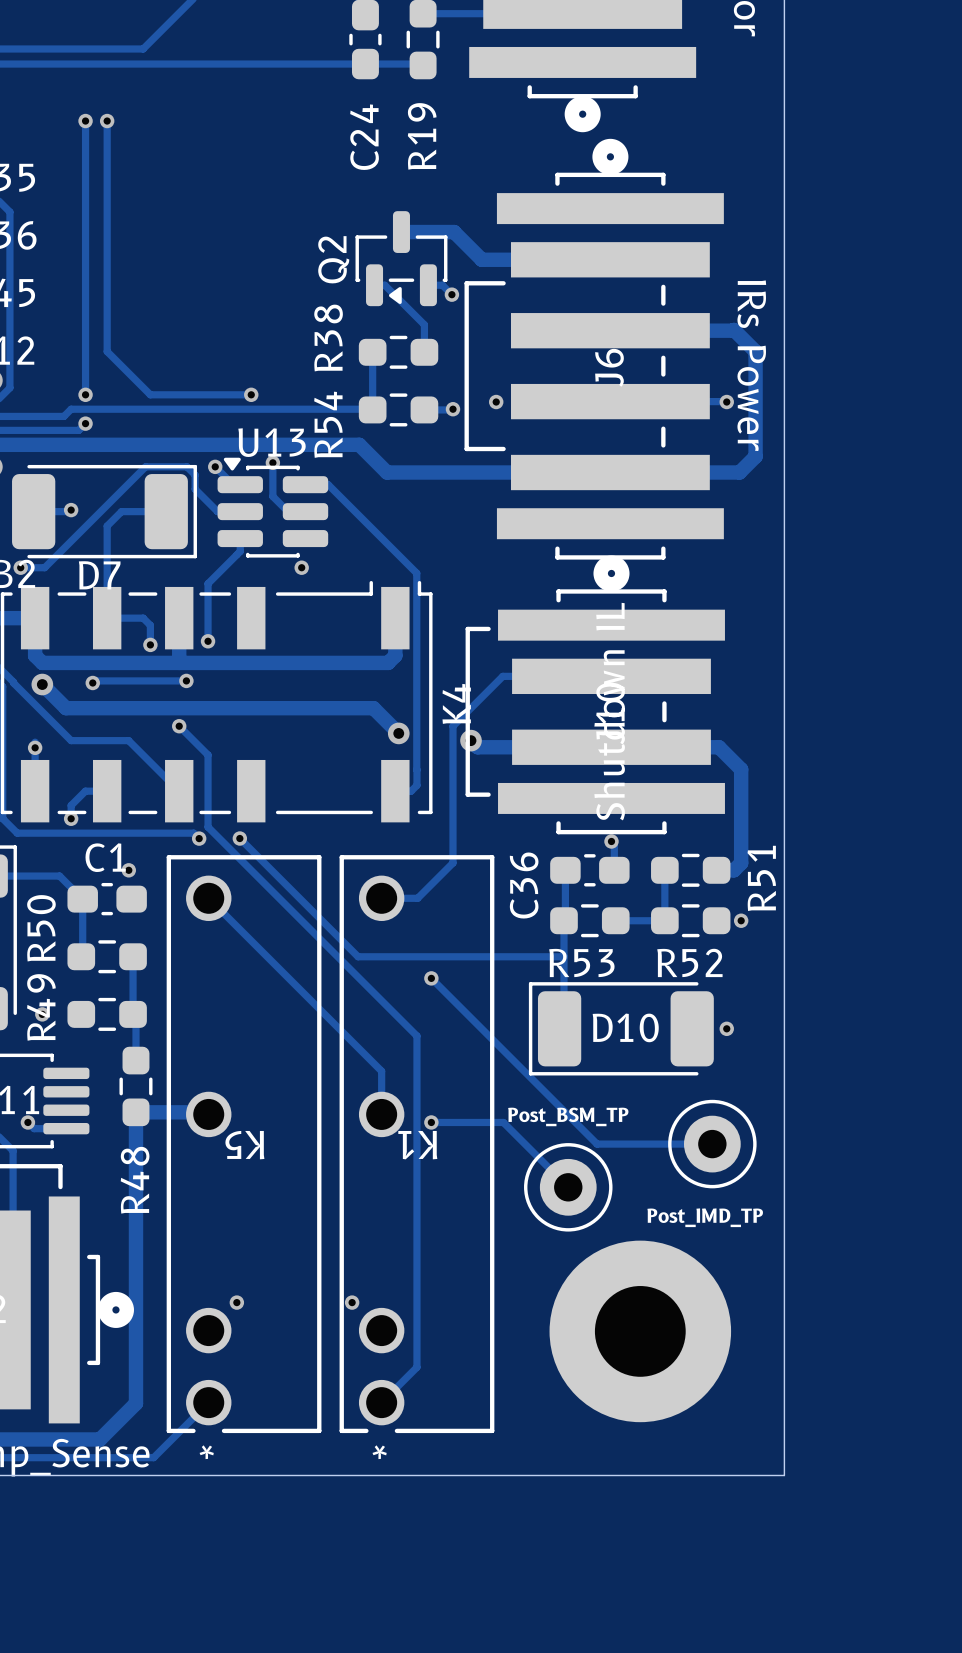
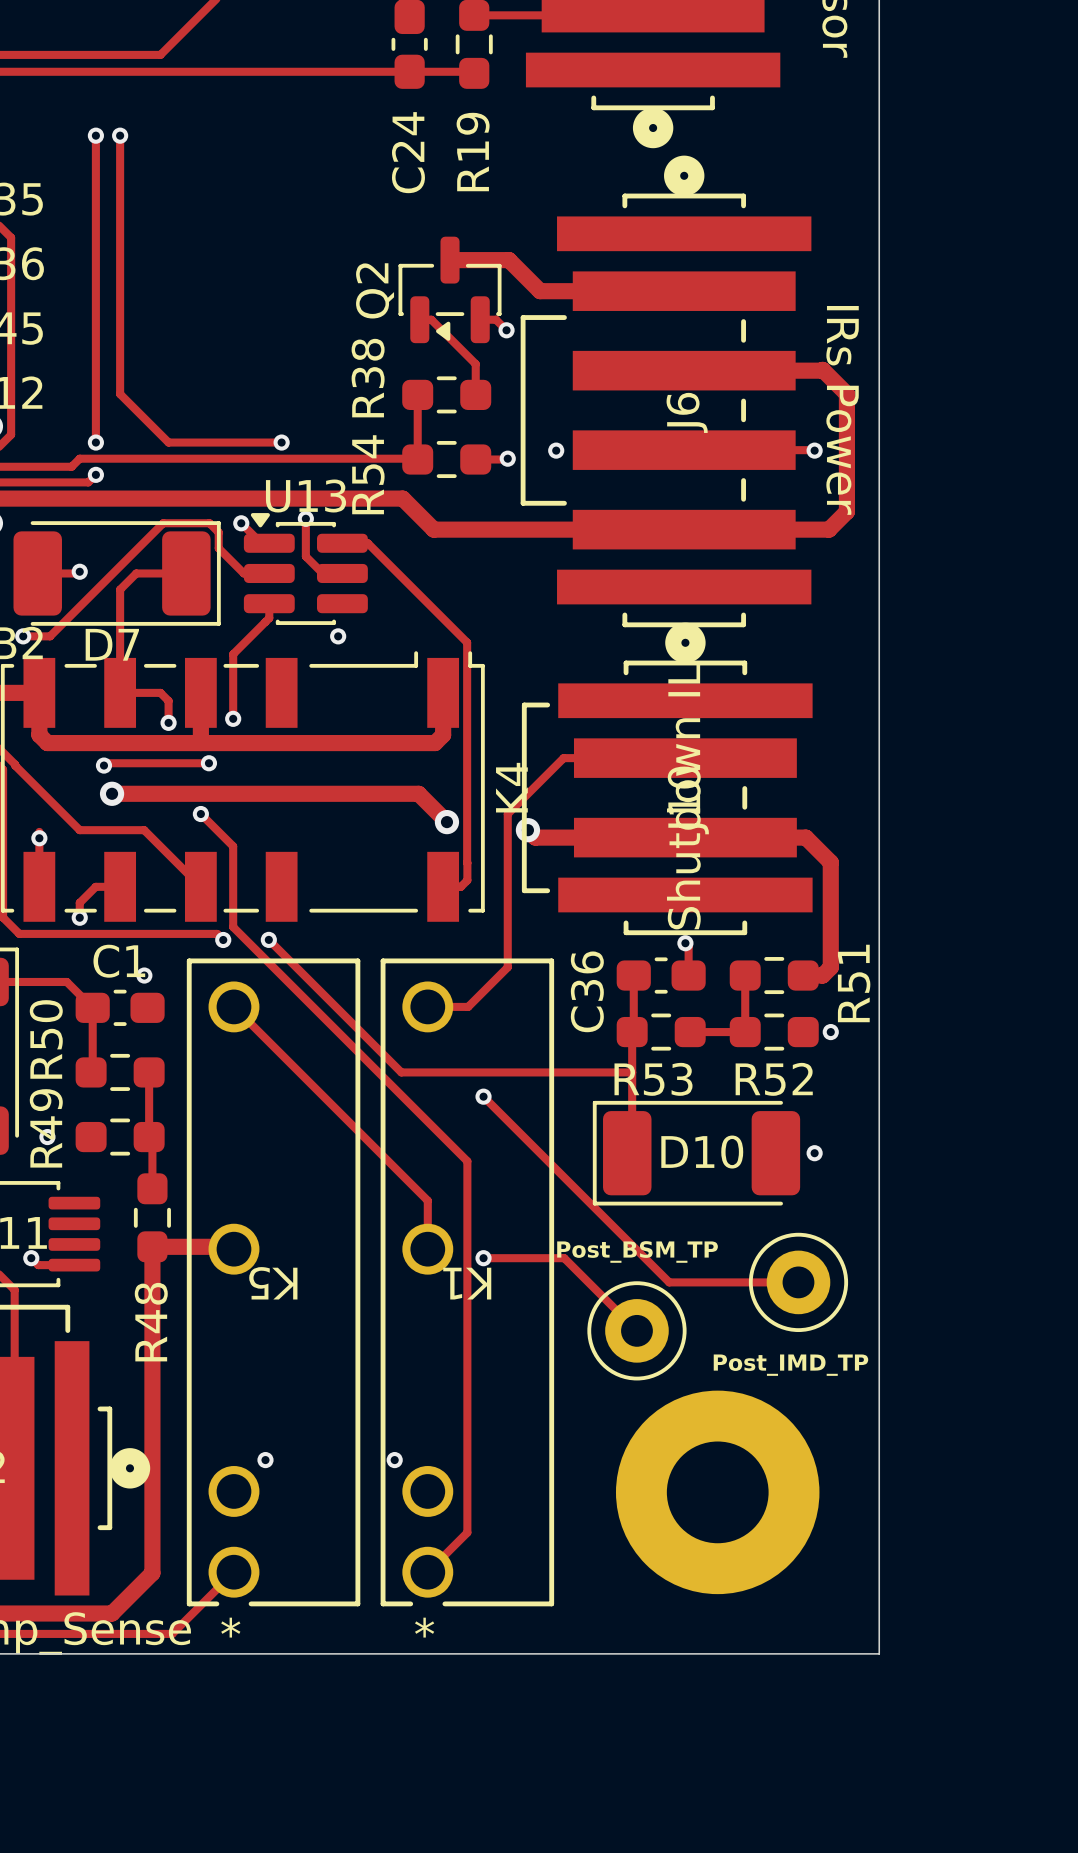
track: (42, 684) (65, 708) (99, 708) -> none
via position: (42, 684) -> (112, 793)

